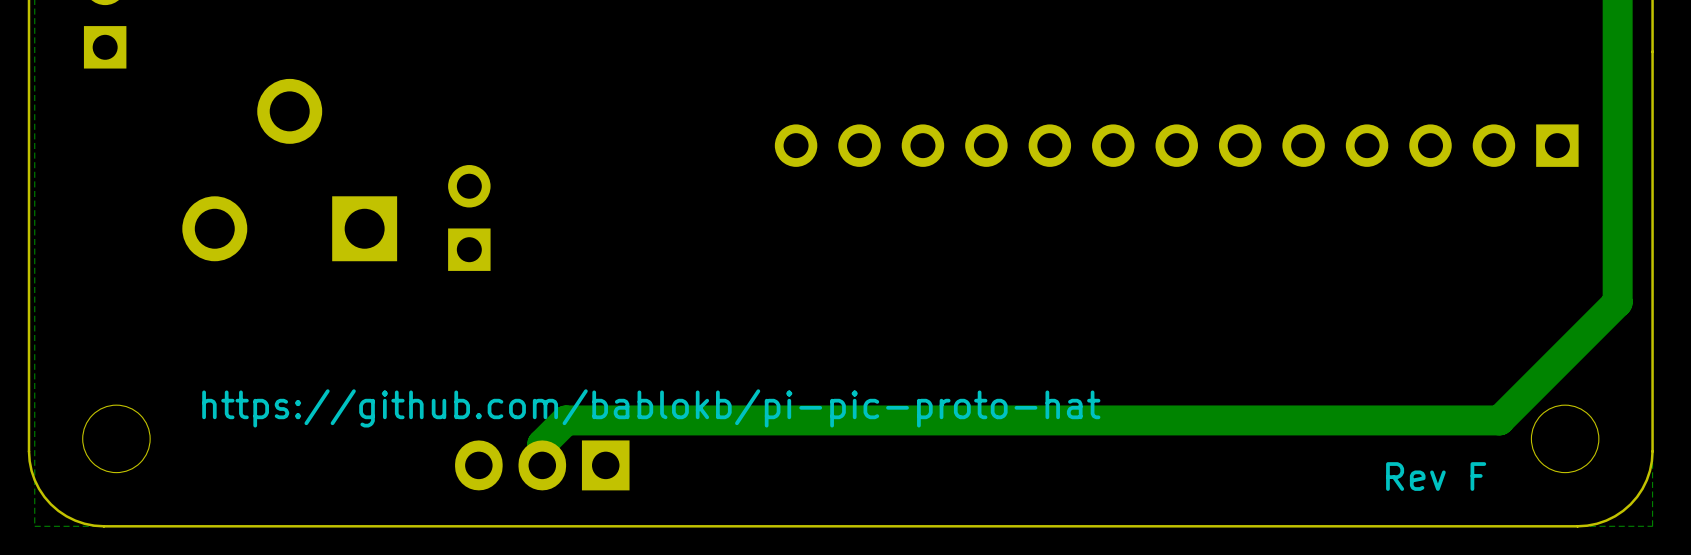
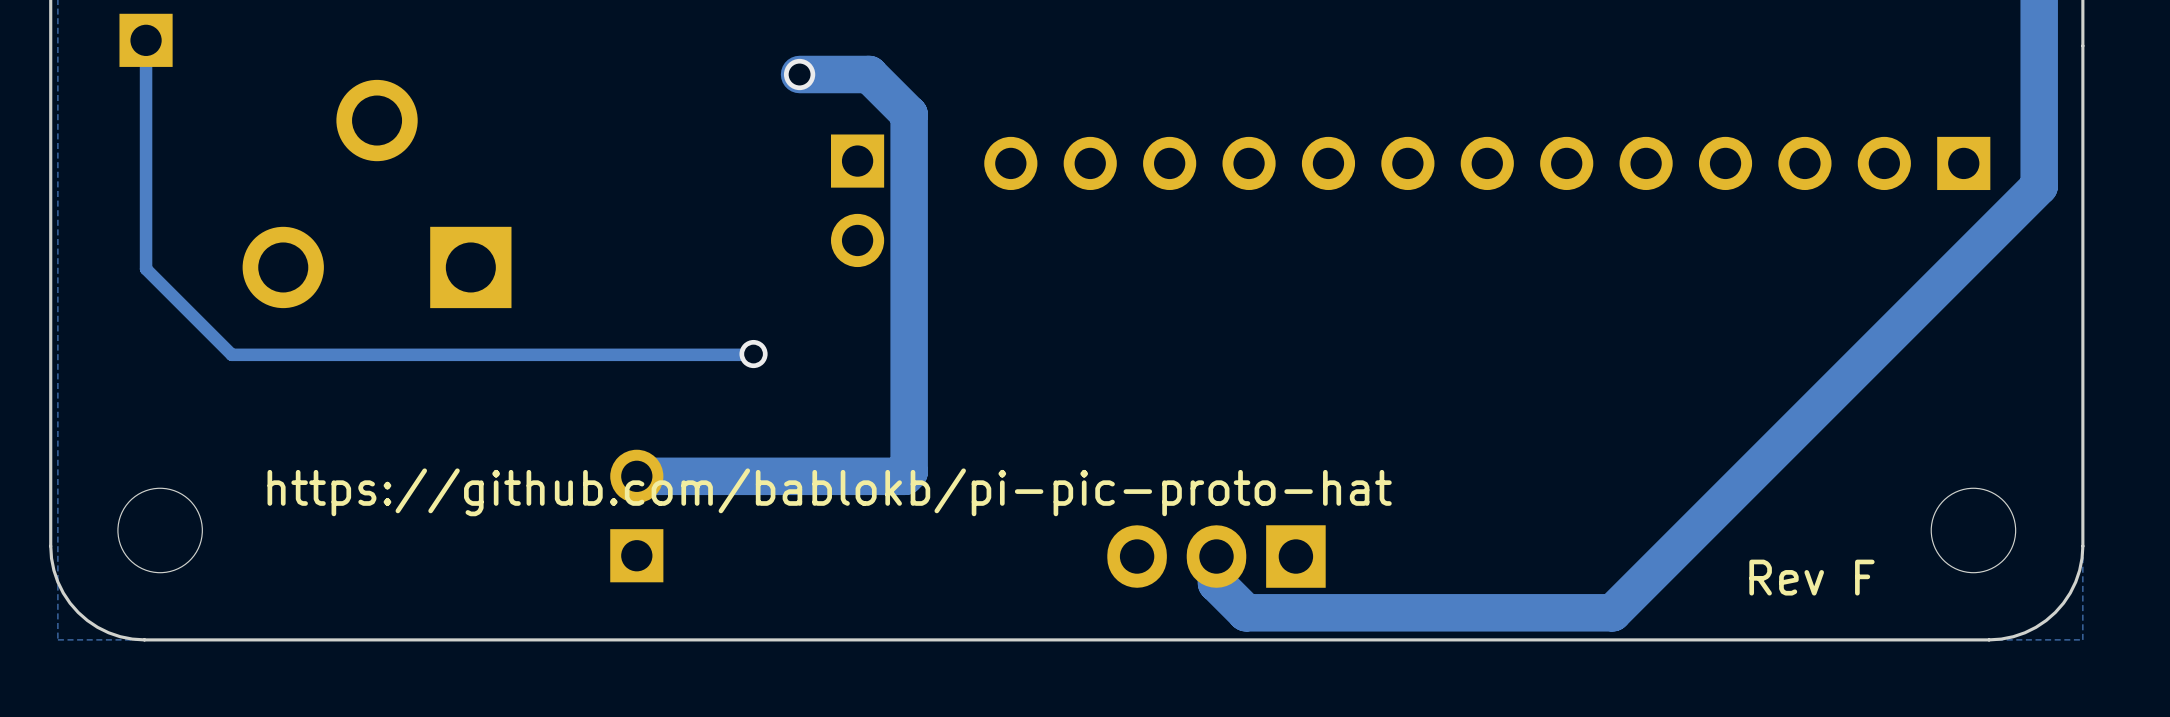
track: none -> (146, 40) (146, 269) (231, 354) (753, 354)
track: none -> (799, 74) (869, 74) (909, 114) (909, 472) (904, 476) (636, 476)
via: none -> (799, 74)
track: (1617, 163) (1617, 302) (1499, 420) (565, 420) (542, 444) (542, 465) -> (2039, 186) (1612, 612) (1246, 612) (1216, 583) (1216, 556)
part: none -> (857, 200)
part: (469, 217) -> none
via: none -> (753, 354)
part: none -> (636, 516)
part position: (542, 465) -> (1216, 556)

